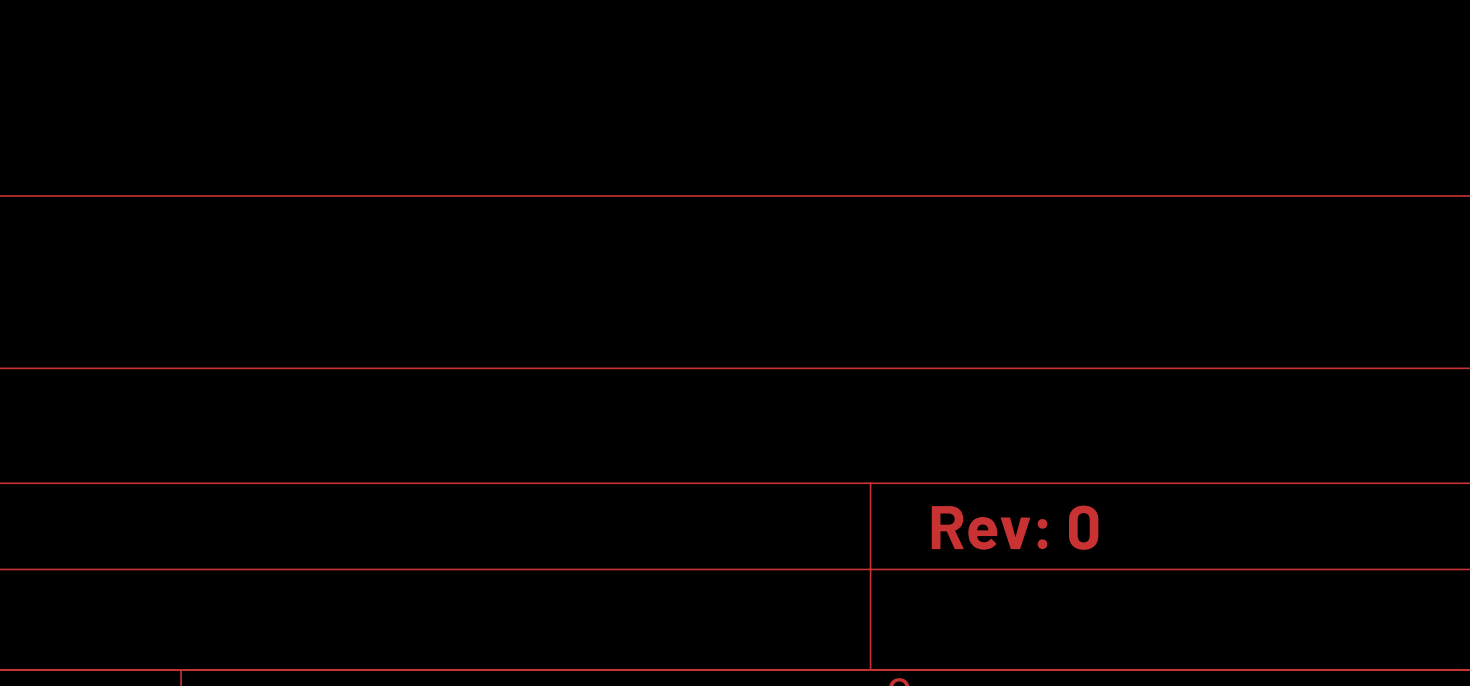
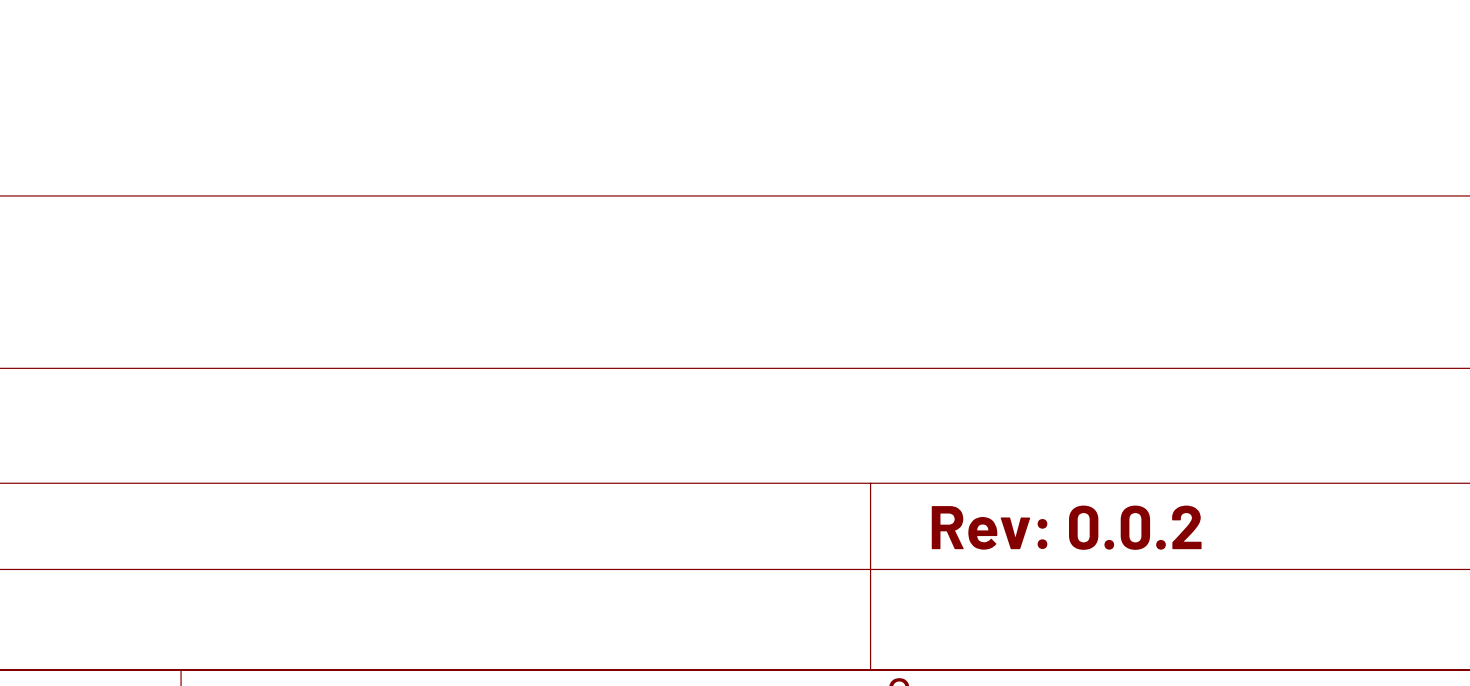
title block: Rev: 0 (1015, 527) -> Rev: 0.0.2 (1066, 527)

